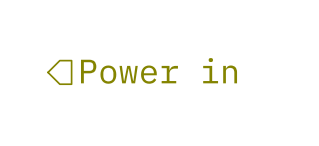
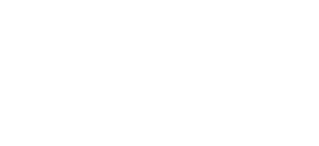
hierarchical label: Power in (159, 70) -> none

